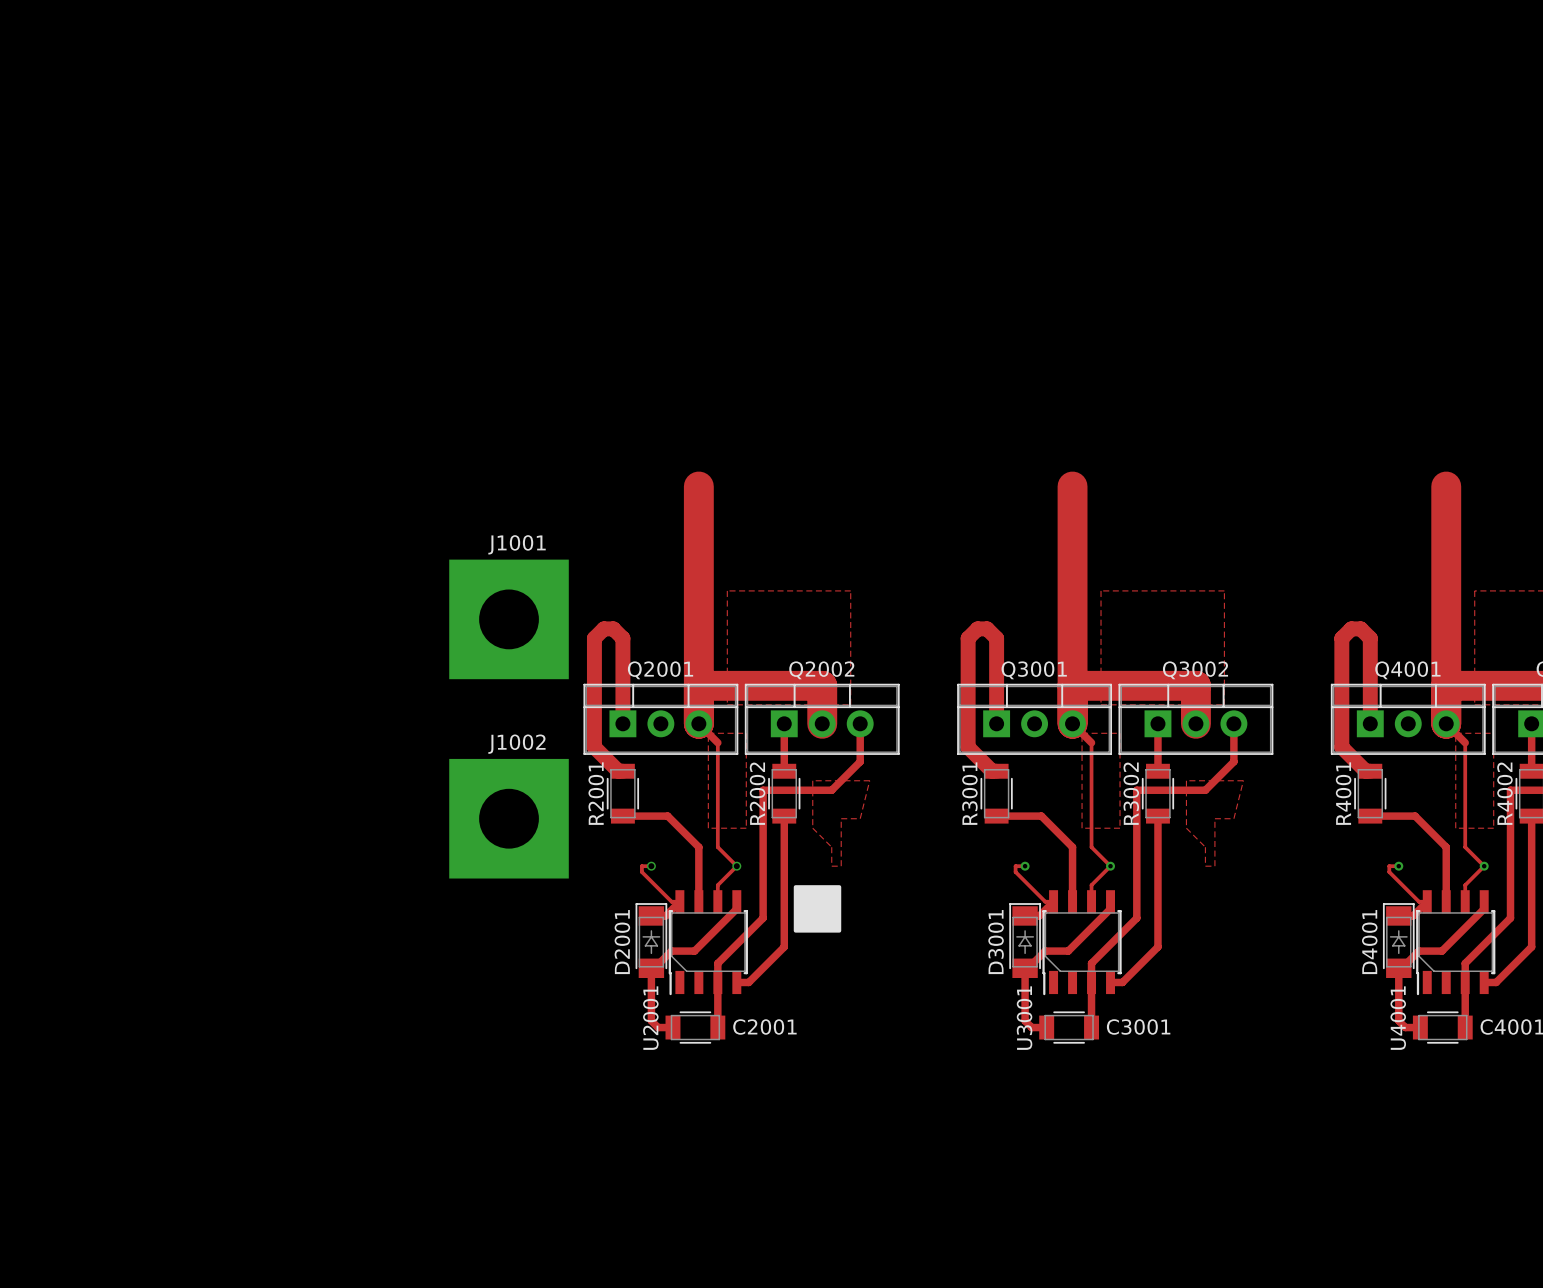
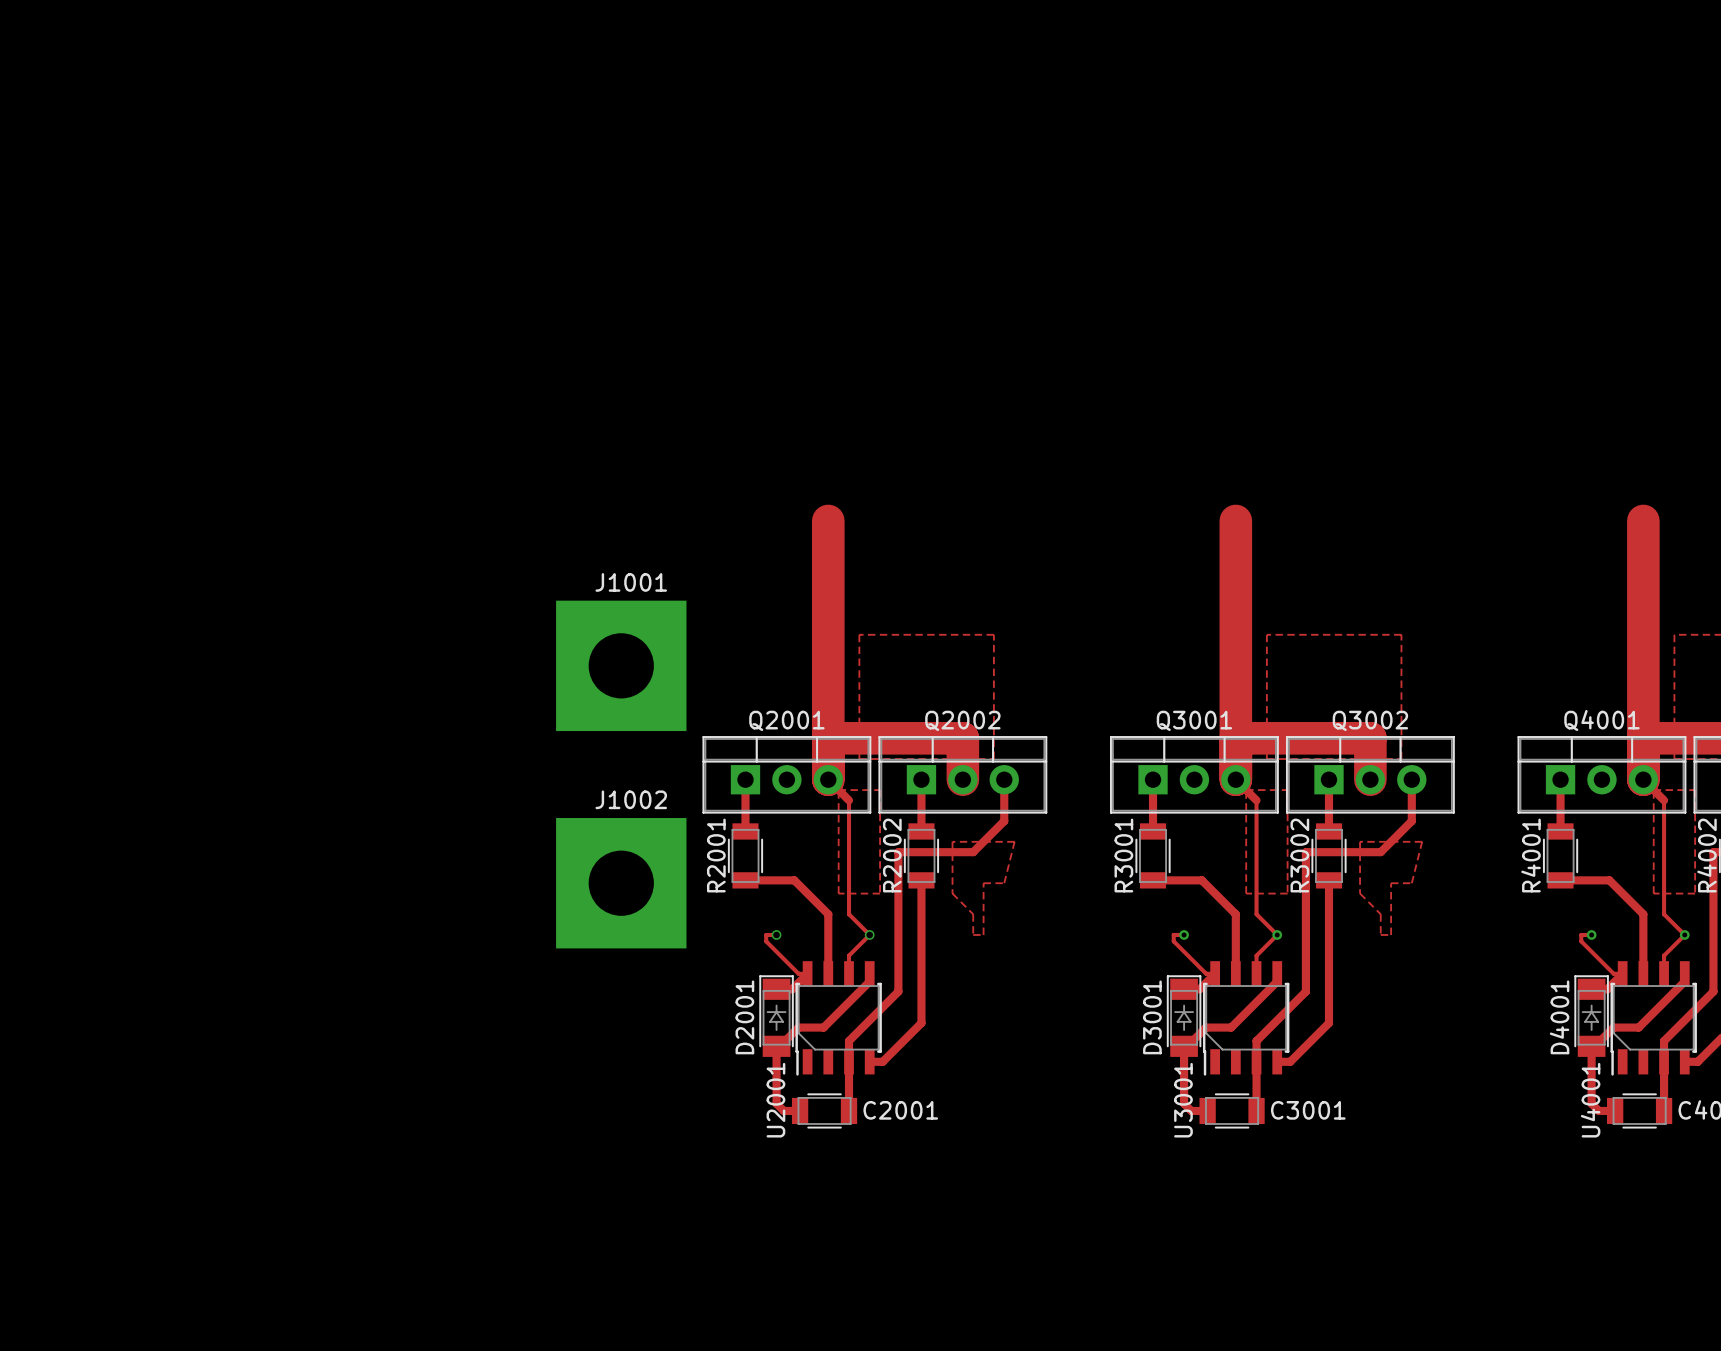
track: (622, 723) (622, 638) (613, 628) (603, 628) (594, 638) (594, 747) (618, 771) (622, 771) -> (745, 779) (745, 831)
track: (996, 723) (996, 638) (987, 628) (977, 628) (968, 638) (968, 747) (992, 771) (996, 771) -> (1153, 779) (1153, 831)
track: (1370, 723) (1370, 638) (1360, 628) (1351, 628) (1341, 638) (1341, 747) (1365, 771) (1370, 771) -> (1560, 779) (1560, 831)
drawing: [793, 885, 842, 933] -> none

